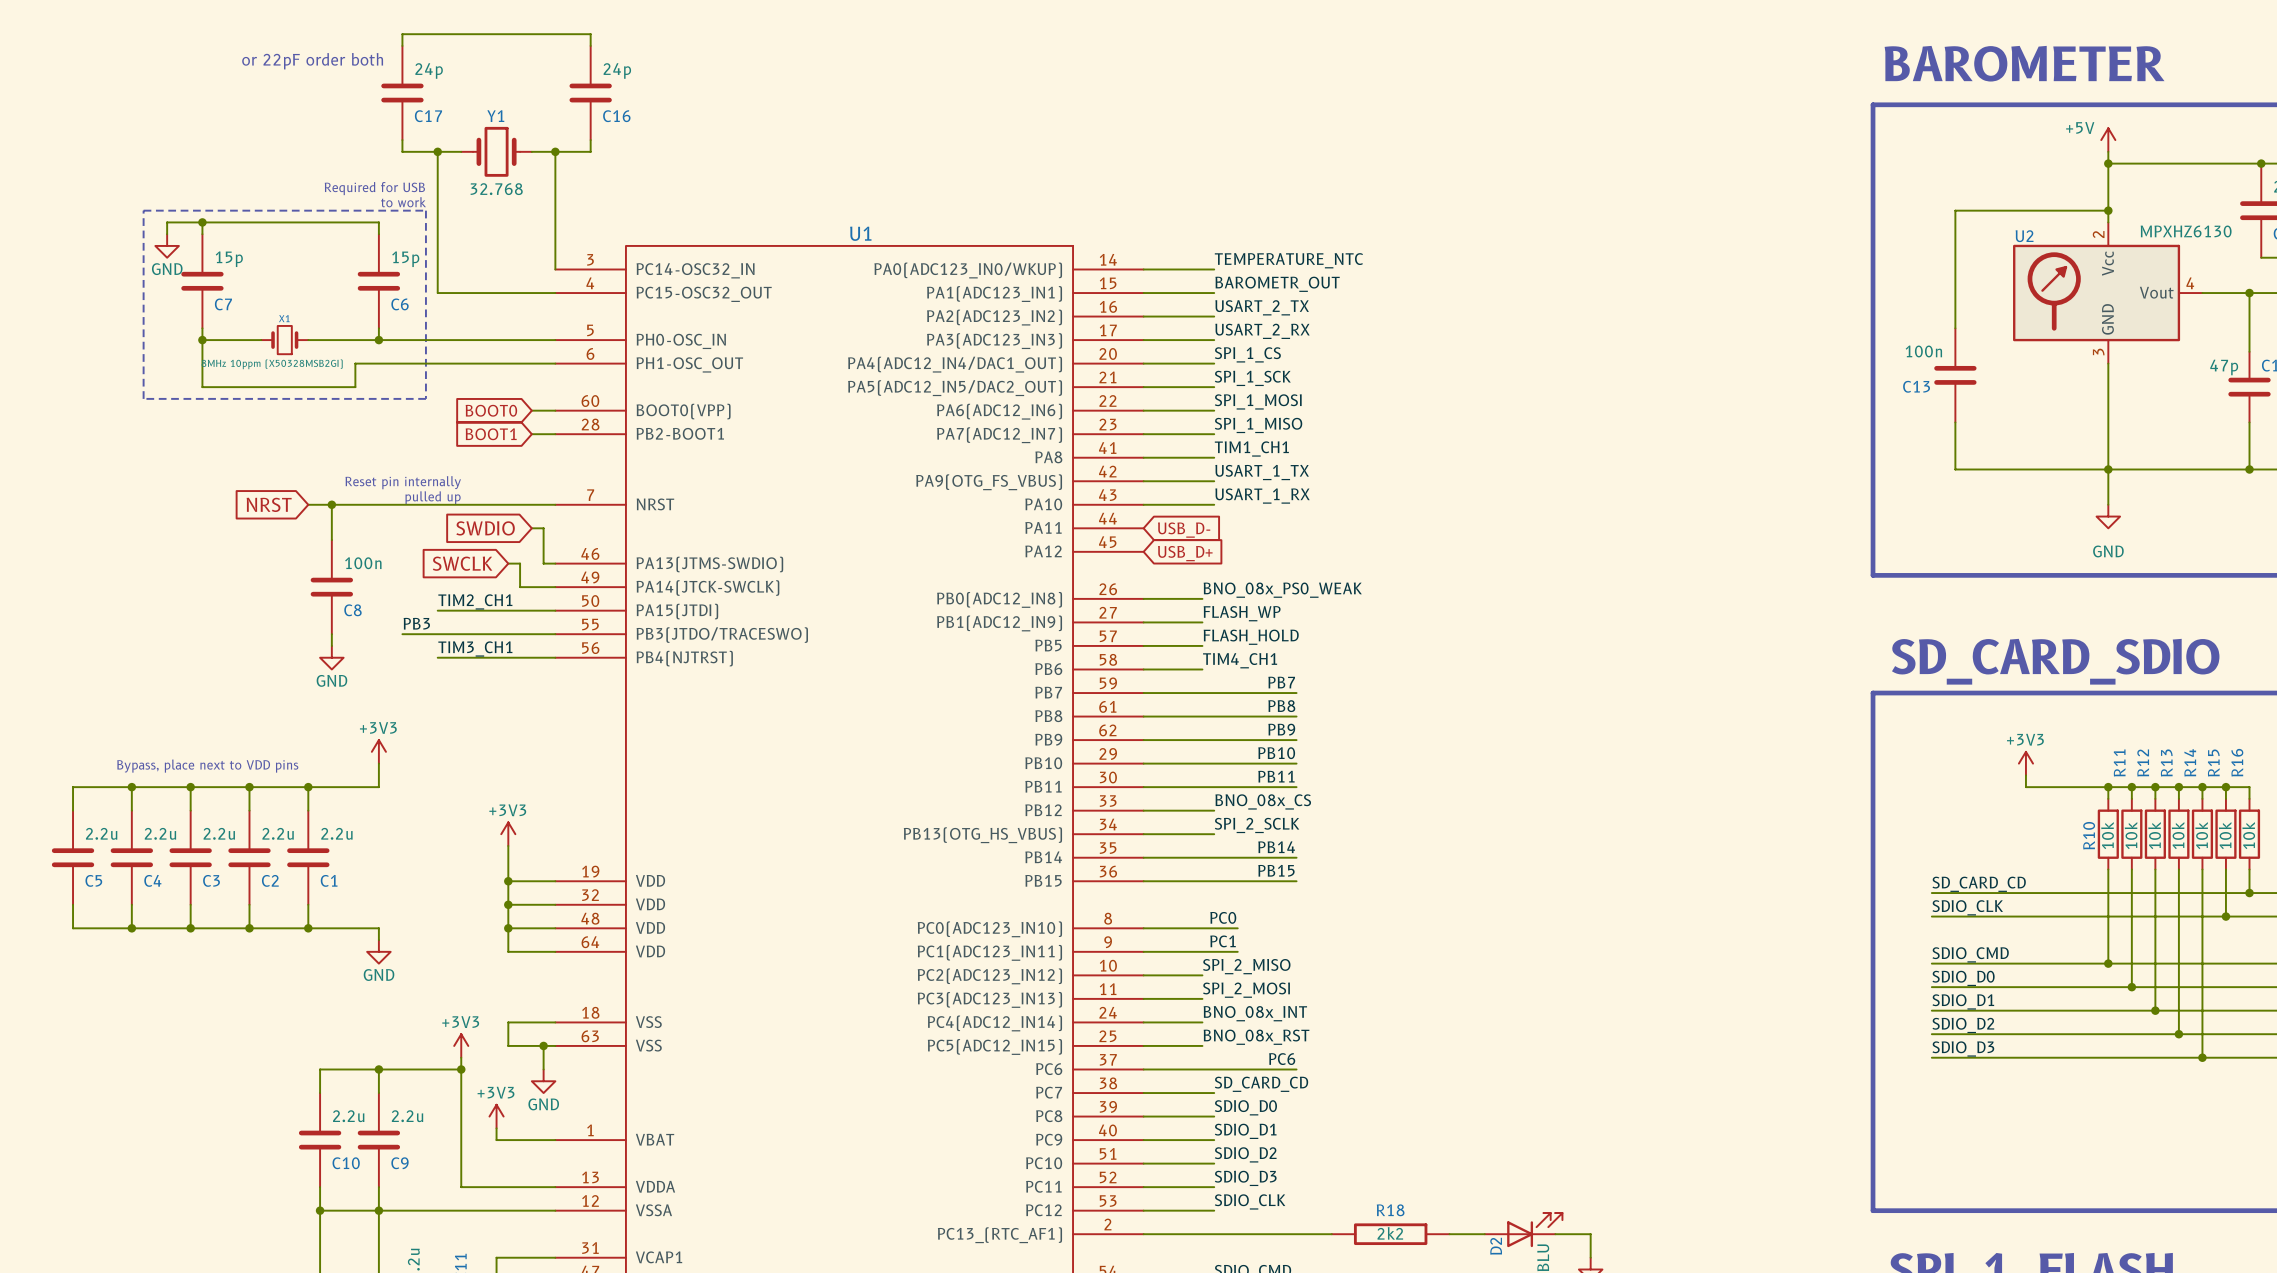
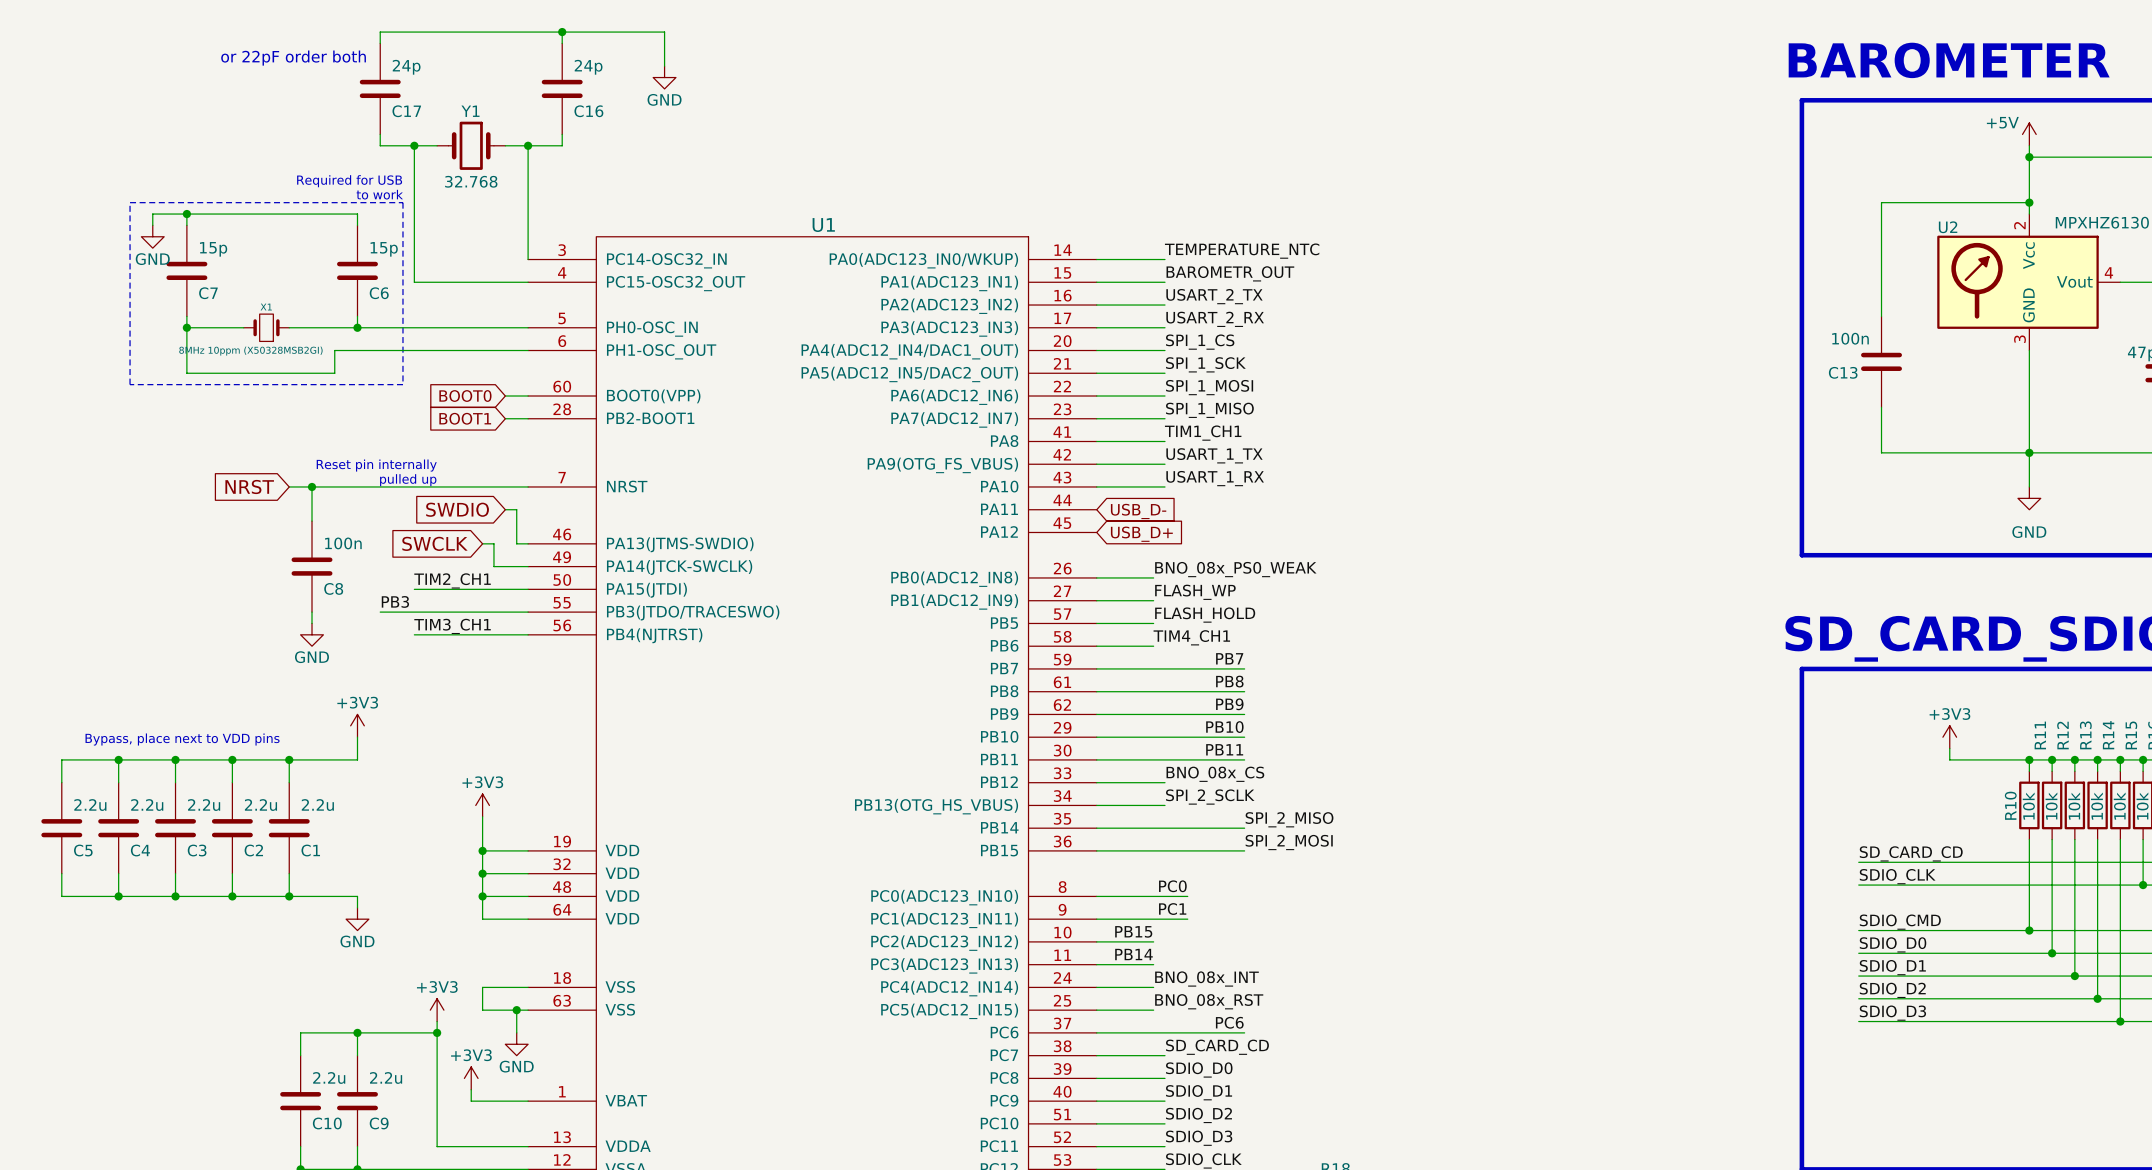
wire: none -> (562, 32) (664, 32) (664, 66)
junction: none -> (562, 32)
power symbol: none -> GND (664, 77)
label: PB14 (1276, 847) -> SPI_2_MISO (1289, 819)
label: PB15 (1276, 870) -> SPI_2_MOSI (1289, 842)
label: SPI_2_MISO (1246, 966) -> PB15 (1133, 931)
label: SPI_2_MOSI (1246, 990) -> PB14 (1133, 954)

